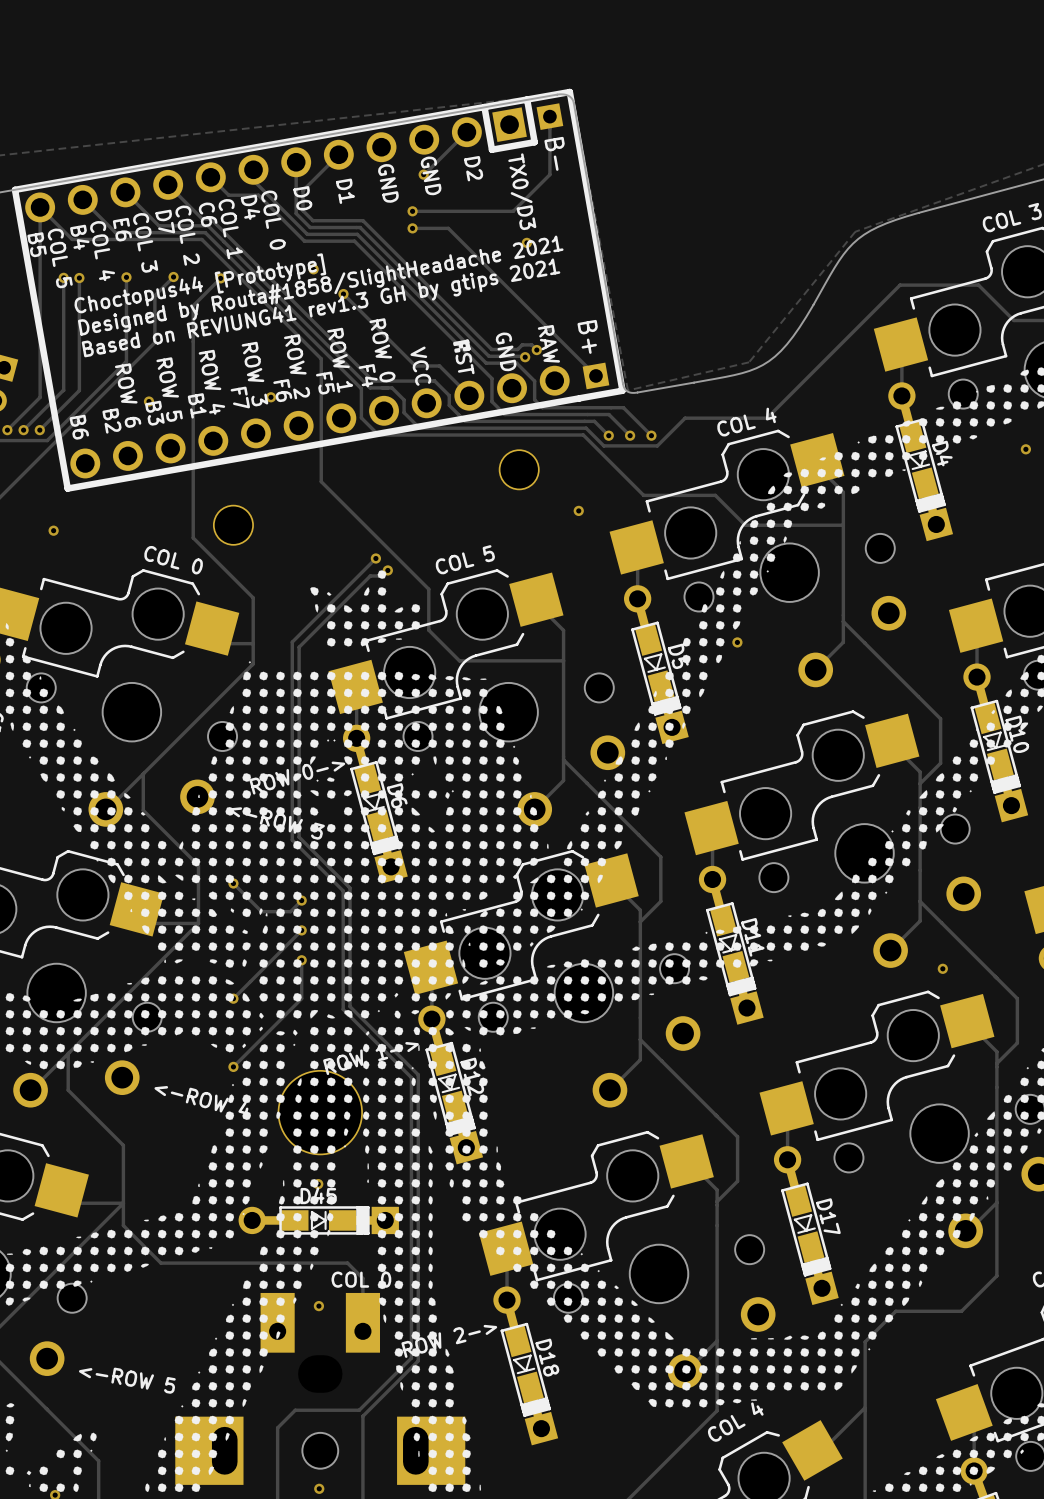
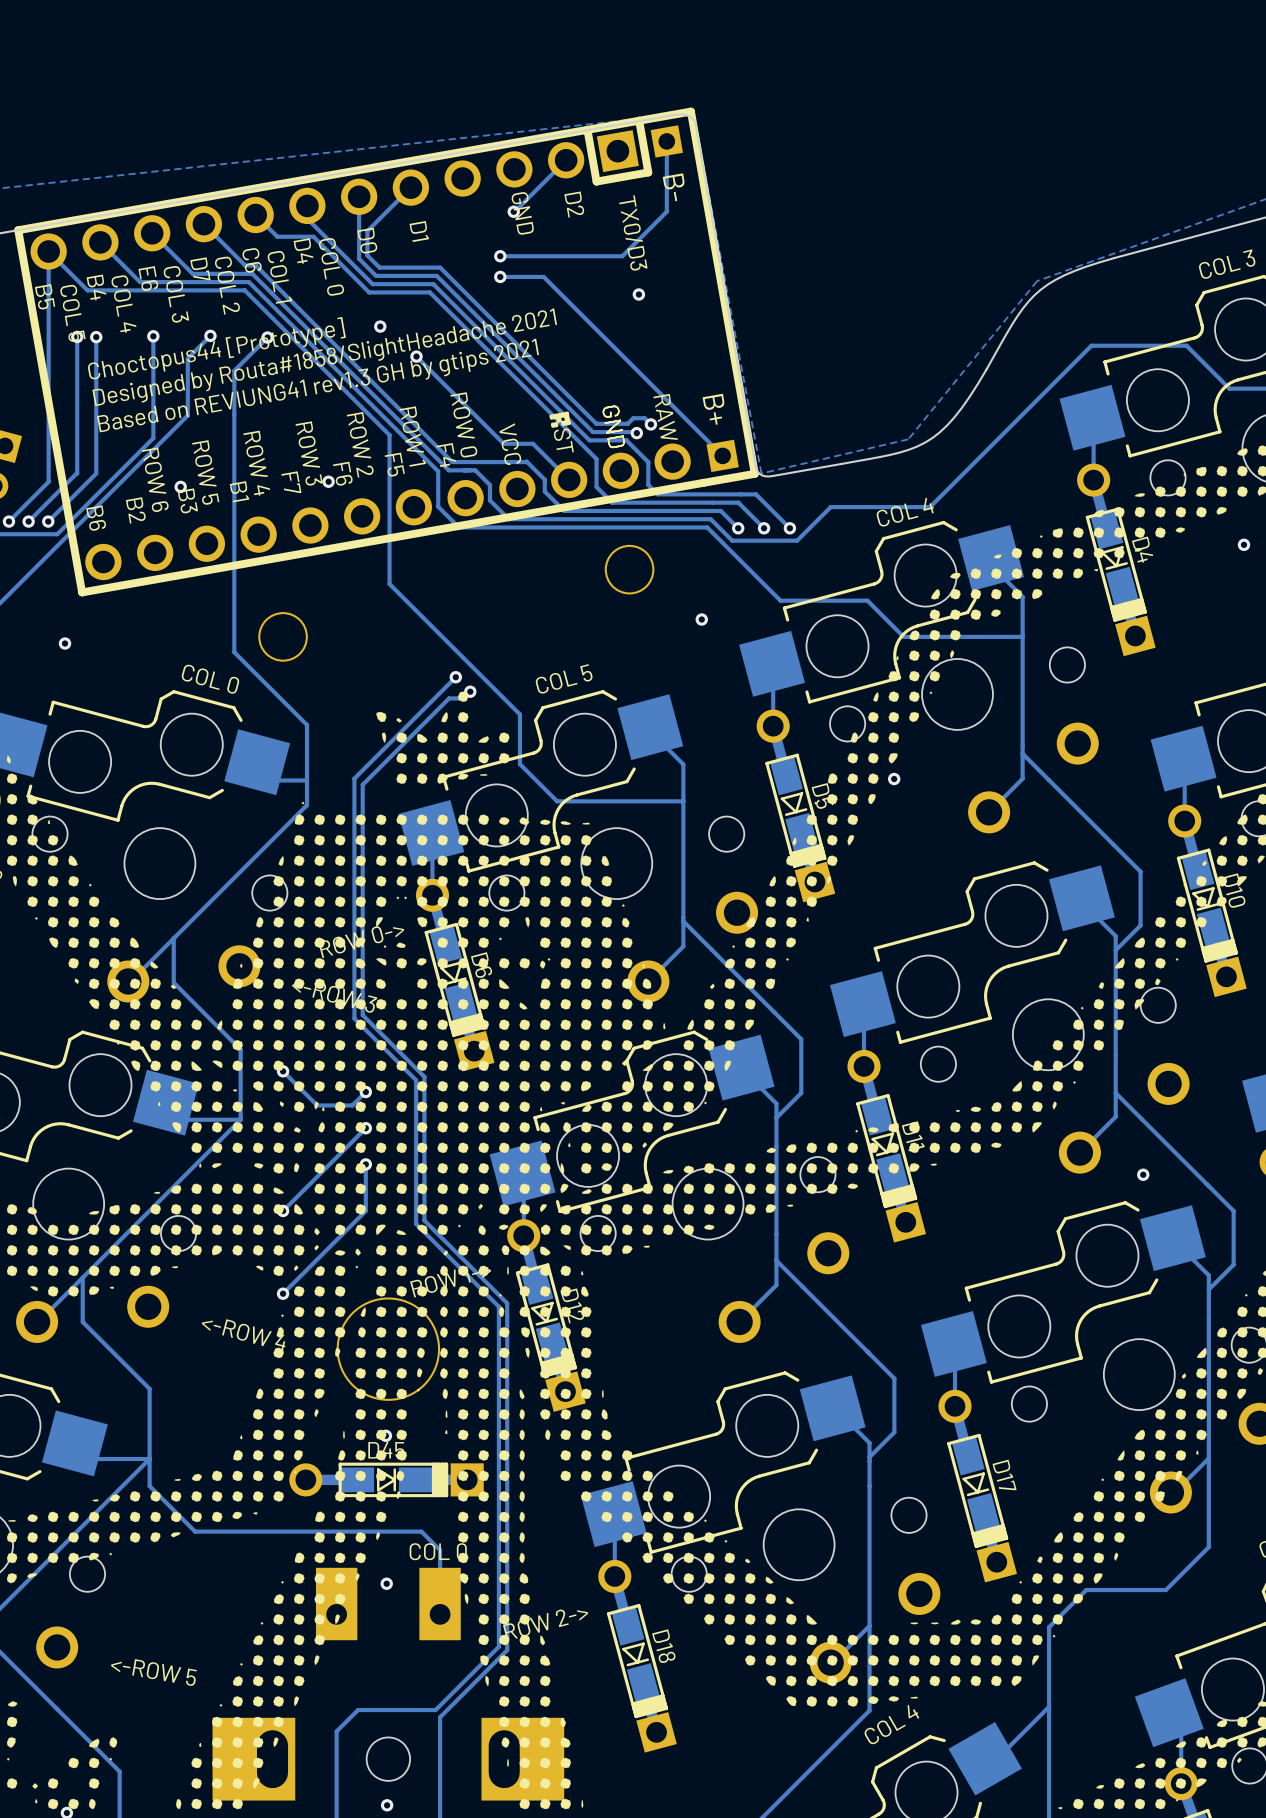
part footprint: [11, 88, 626, 492] -> [14, 107, 759, 597]

